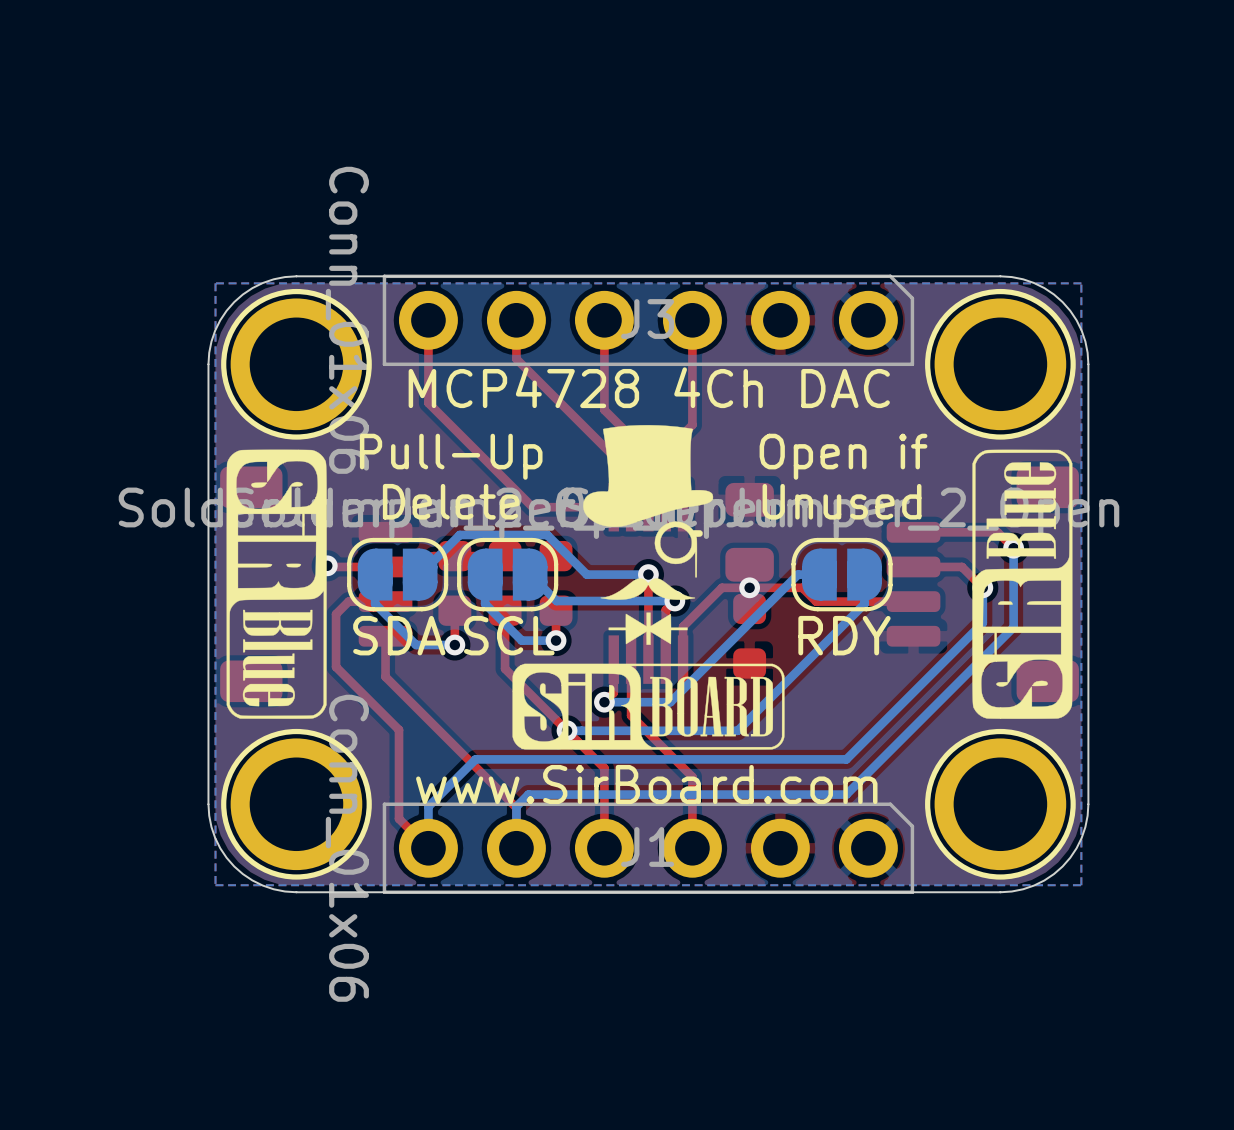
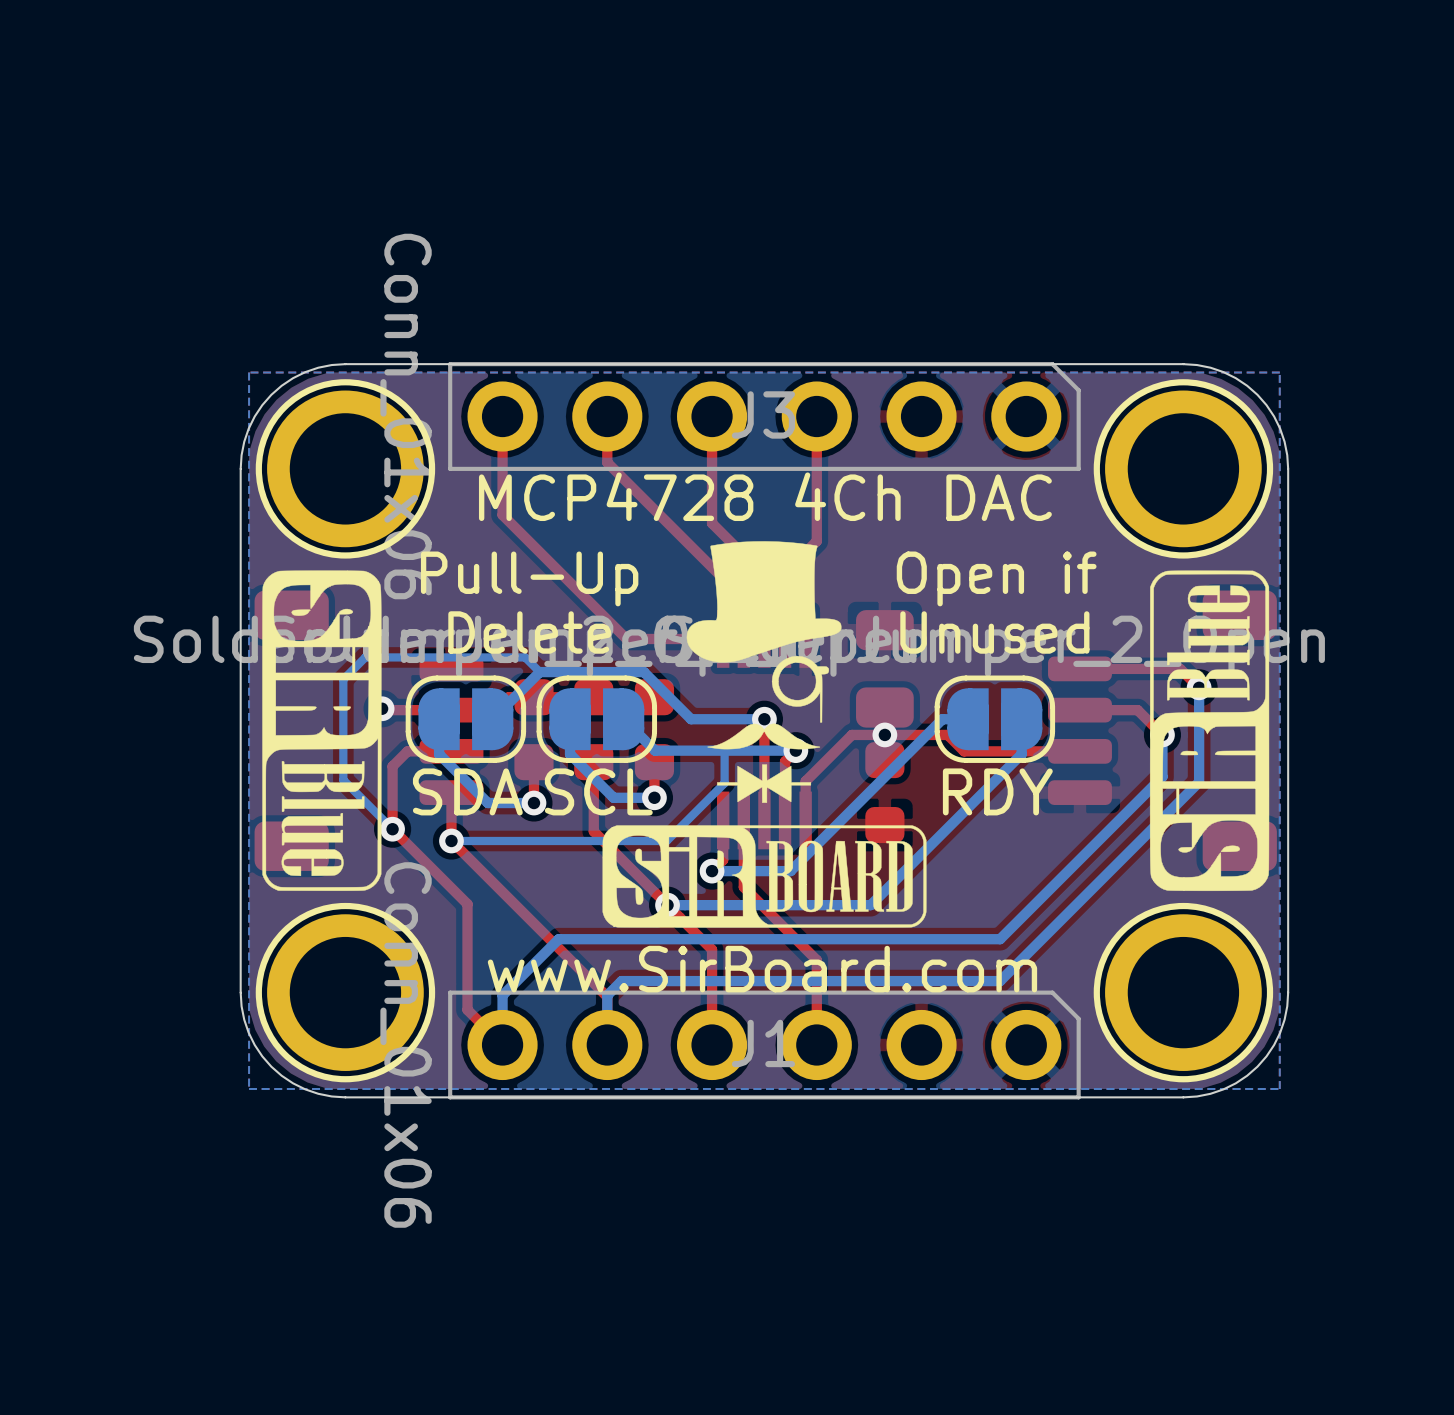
bottom track: none -> (539, 672) (525, 657) (365, 657) (343, 679) (343, 779) (392, 829)
bottom track: none -> (724, 750) (724, 783) (666, 840) (451, 840)
via: none -> (392, 829)
via: none -> (451, 840)

